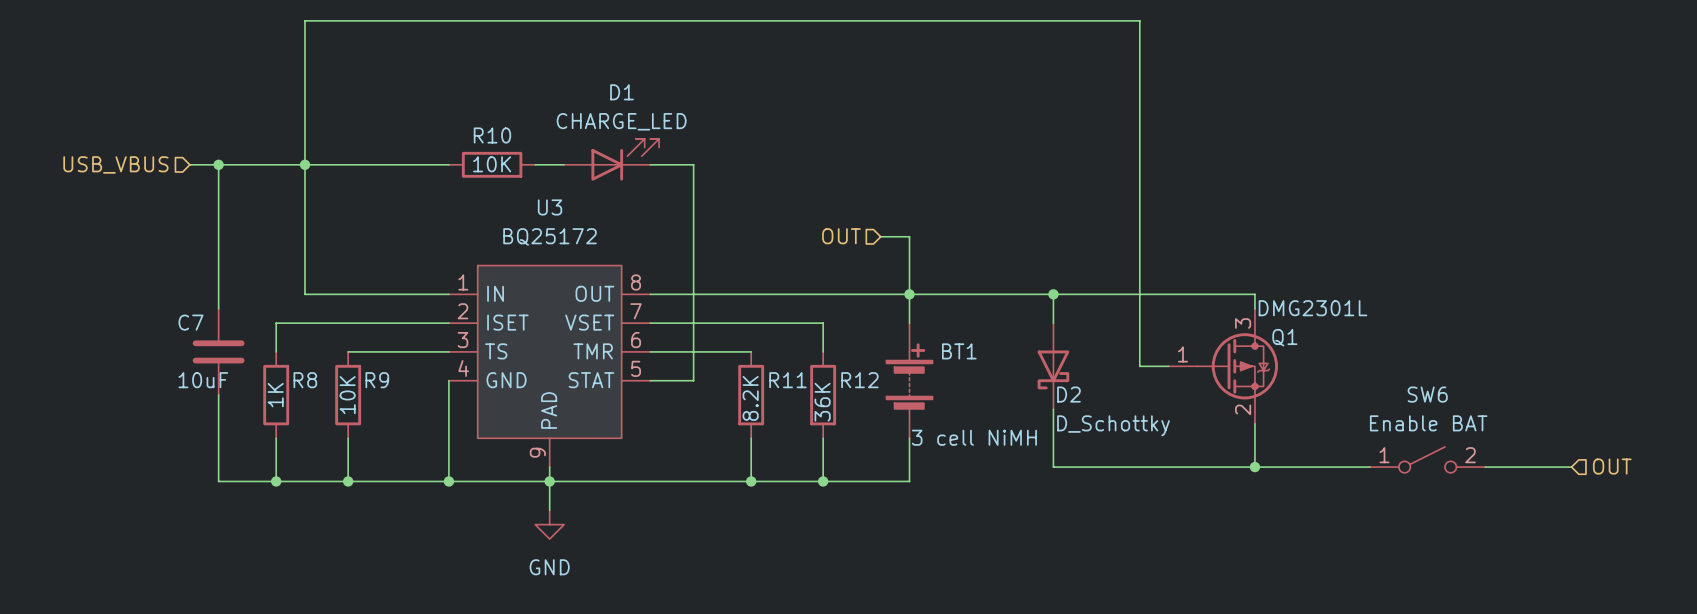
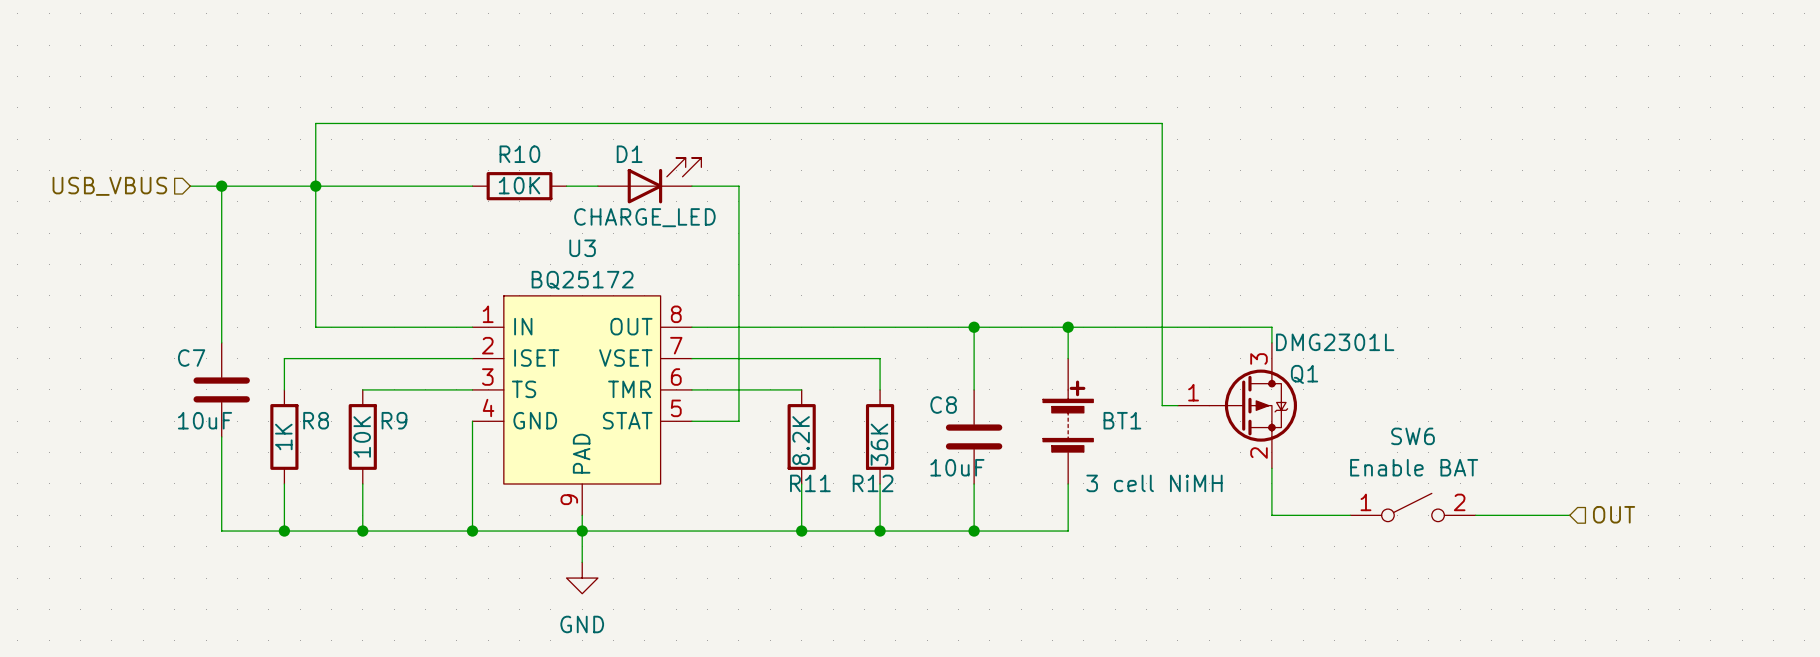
D1 name position: D1 (621, 92) -> D1 (629, 154)
wire: (304, 107) (304, 20) (1139, 20) (1139, 366) (1168, 366) -> (315, 123) (1162, 123) (1162, 405) (1177, 405)
D1 value position: CHARGE_LED (621, 121) -> CHARGE_LED (644, 217)
U3 name position: U3 (550, 207) -> U3 (582, 248)
U3 value position: BQ25172 (550, 236) -> BQ25172 (582, 280)
hierarchical label: OUT (841, 236) -> none
wire: (880, 236) (909, 236) (909, 294) -> none
wire: (1053, 294) (1053, 323) -> (1068, 327) (1068, 358)
junction position: (1053, 294) -> (1068, 327)
wire: (1182, 294) (1254, 294) (1254, 308) -> (1271, 327) (1271, 342)
BT1 name position: BT1 (959, 351) -> BT1 (1122, 420)
D2: D_Schottky (1053, 366) -> none
Q1 position: (1223, 366) -> (1237, 405)
R11 name position: R11 (787, 380) -> R11 (810, 483)
R12 name position: R12 (859, 380) -> R12 (873, 483)
BT1 position: (909, 380) -> (1068, 421)
C8: none -> 10uF (974, 436)
wire: (1053, 409) (1053, 467) (1182, 467) -> (1271, 468) (1271, 515)
wire: (1254, 423) (1254, 467) (1370, 467) -> (1569, 515) (1475, 515)
BT1 value position: 3 cell NiMH (974, 437) -> 3 cell NiMH (1154, 483)
wire: none -> (1068, 483) (1068, 531) (974, 531)
SW6 position: (1427, 459) -> (1413, 507)
hierarchical label position: OUT (1612, 466) -> OUT (1614, 514)
junction: (1254, 467) -> none
wire: (1485, 467) (1571, 467) -> none
junction: none -> (974, 531)

